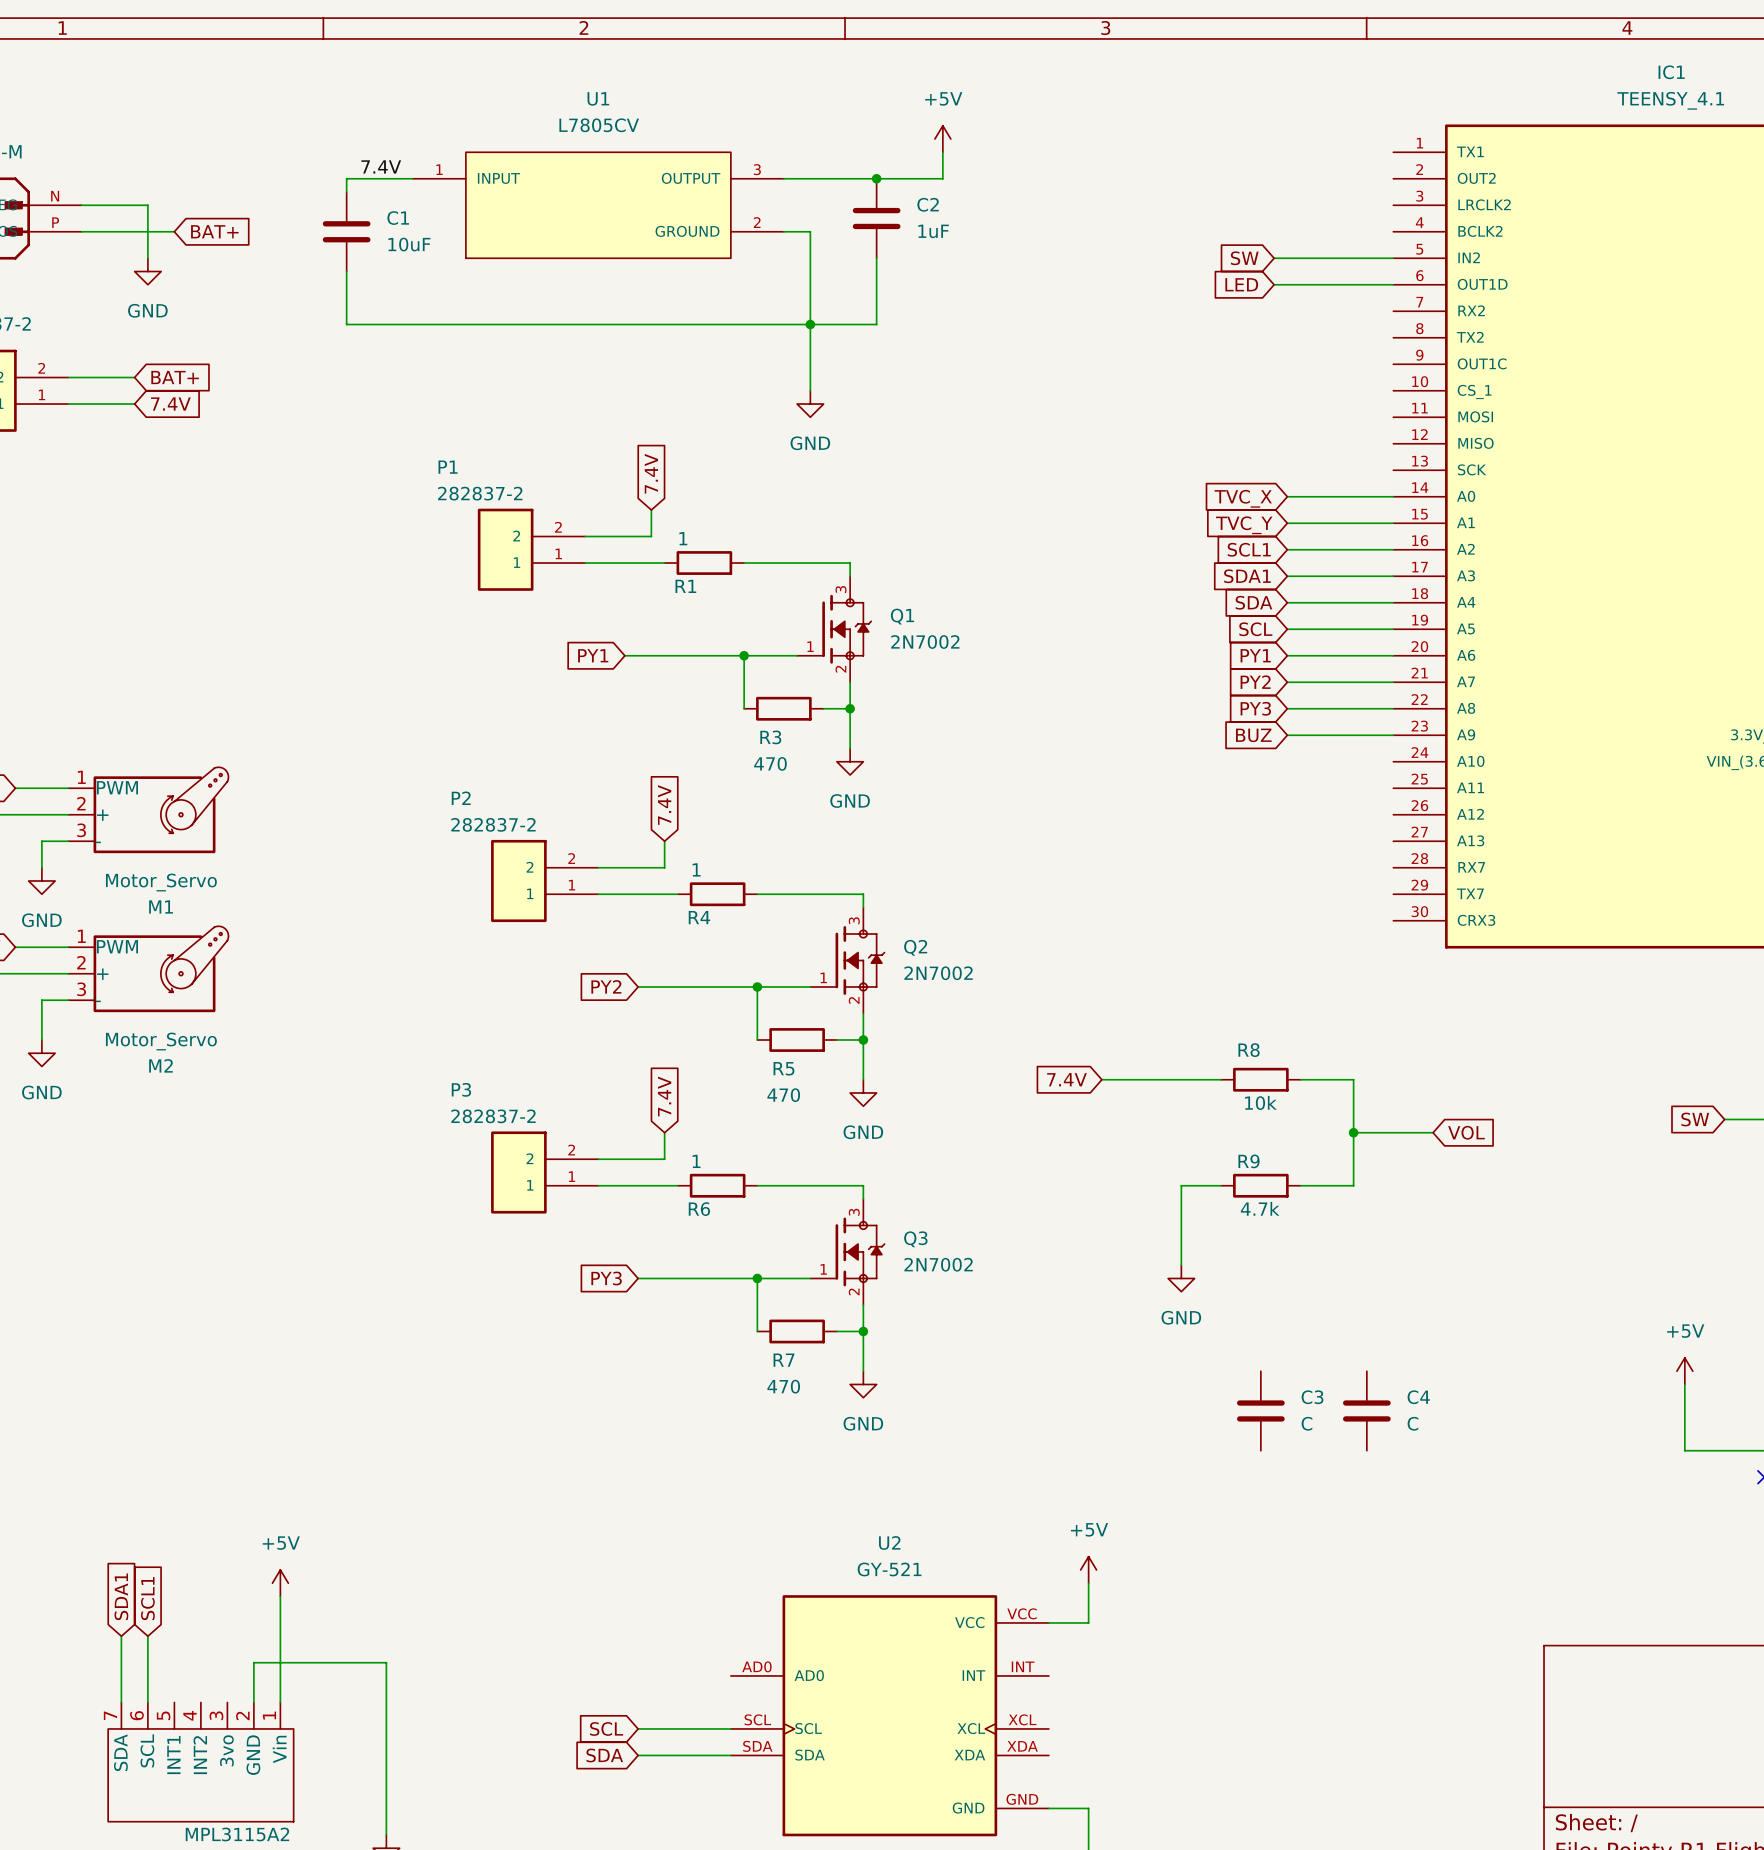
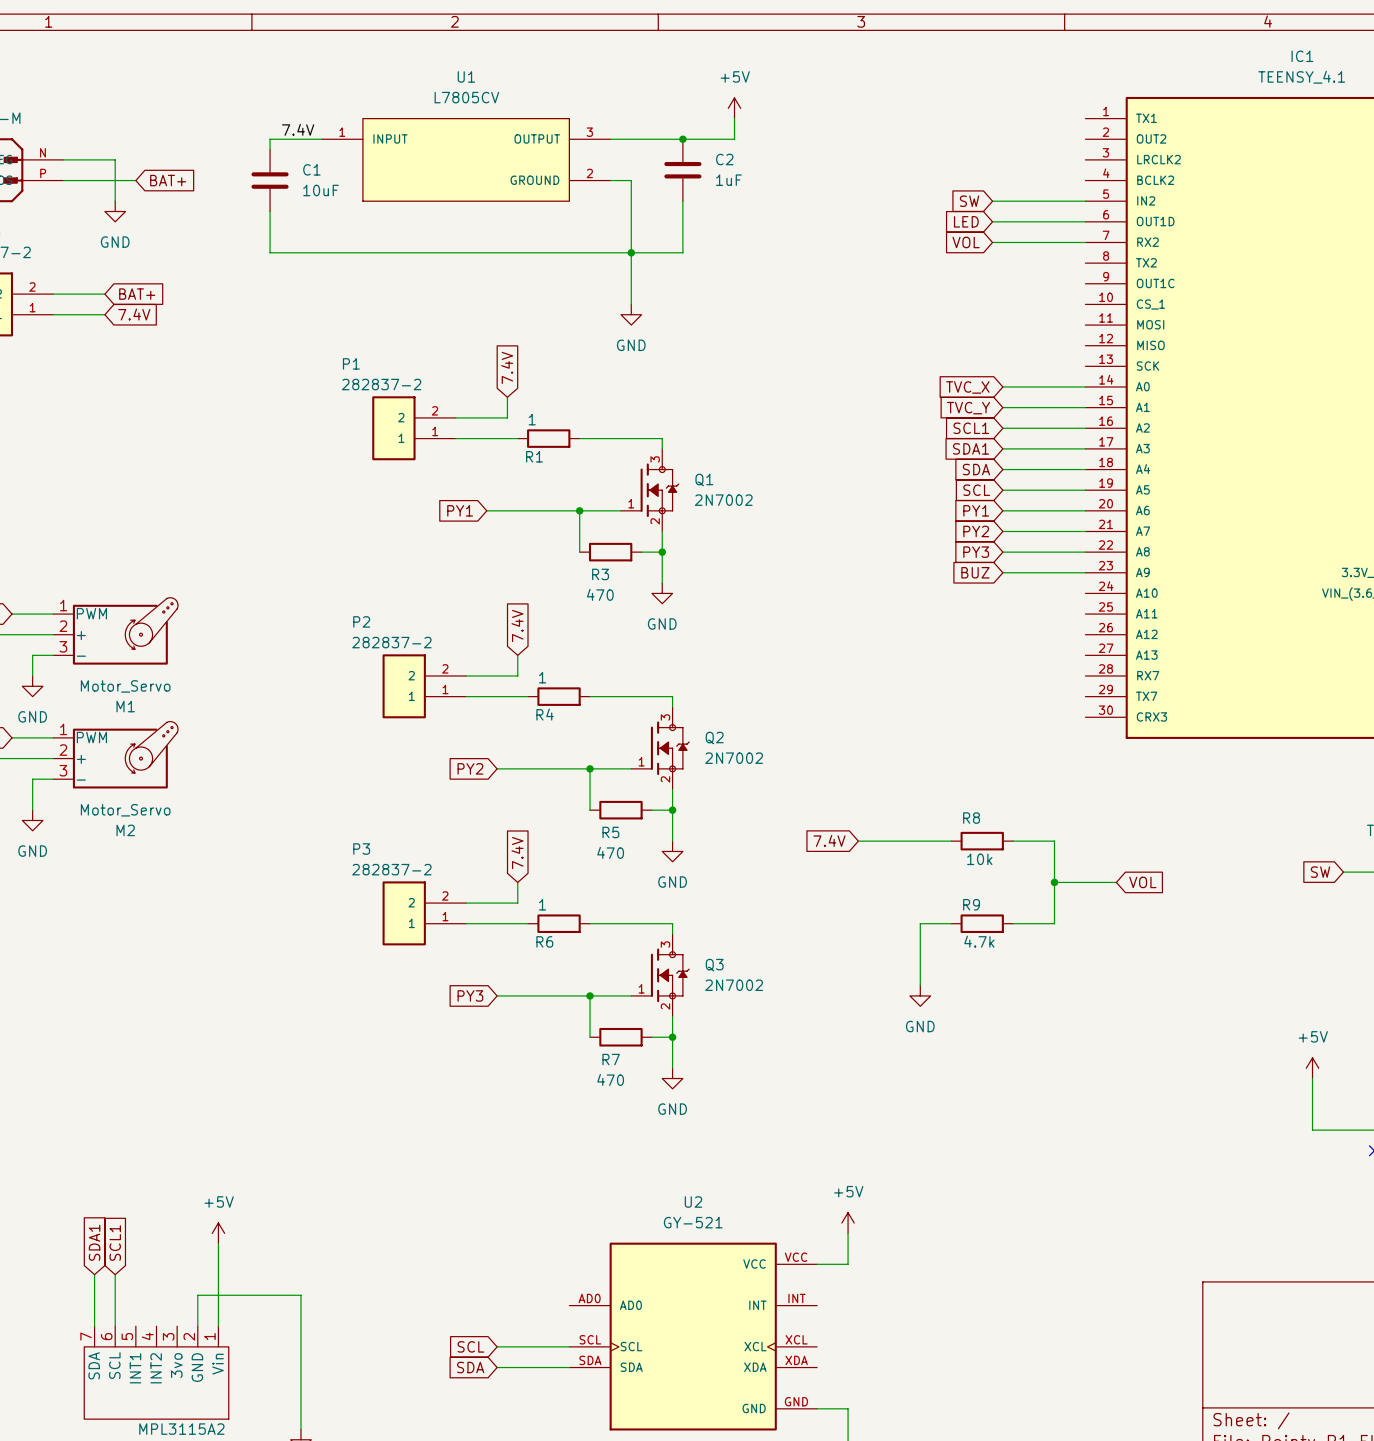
global label: none -> VOL (966, 242)
wire: none -> (992, 242) (1085, 242)
C3: C (1260, 1410) -> none
C4: C (1366, 1410) -> none

